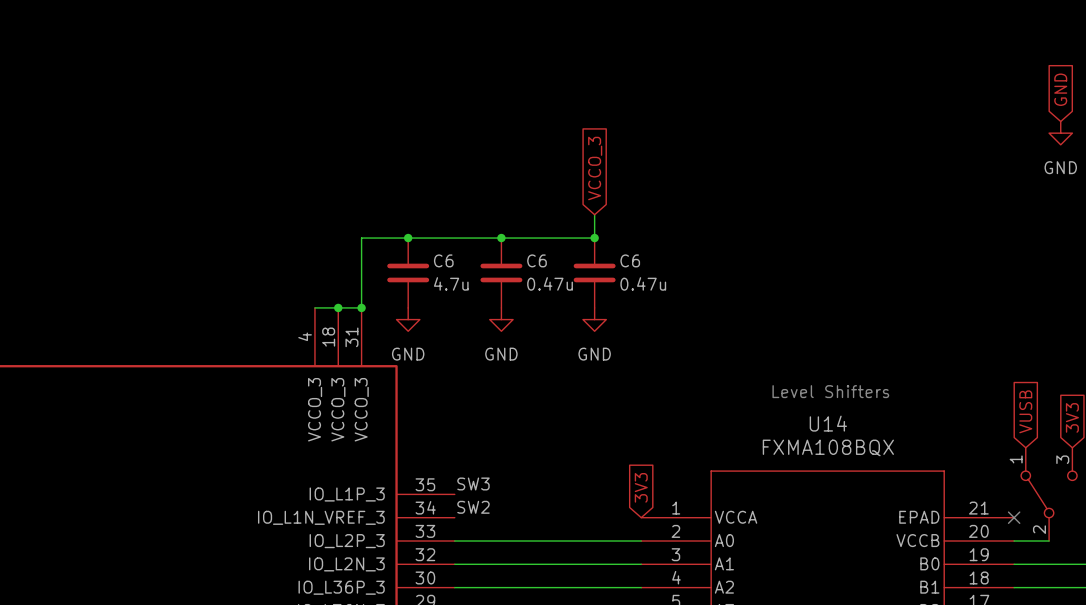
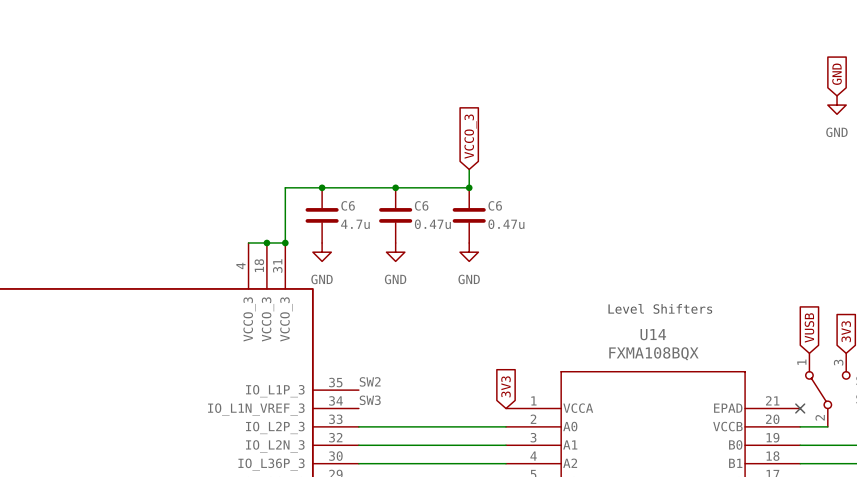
label: SW3 (473, 483) -> SW2 (370, 381)
label: SW2 (473, 507) -> SW3 (370, 400)

